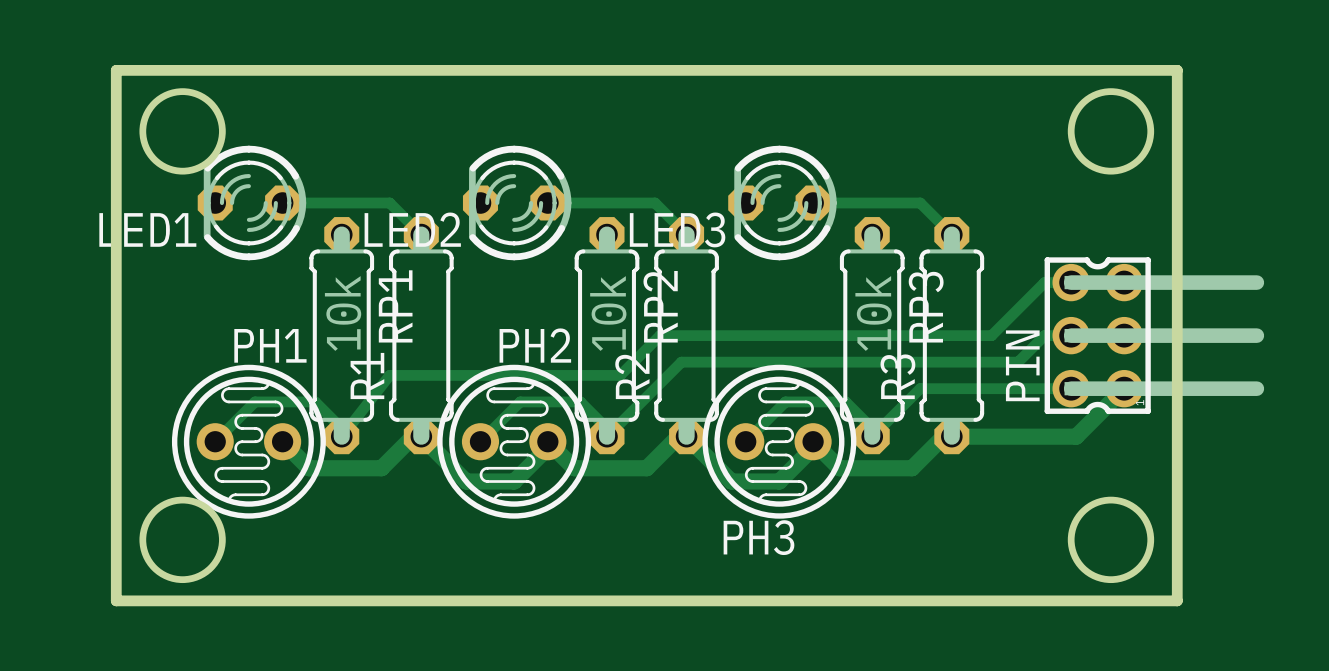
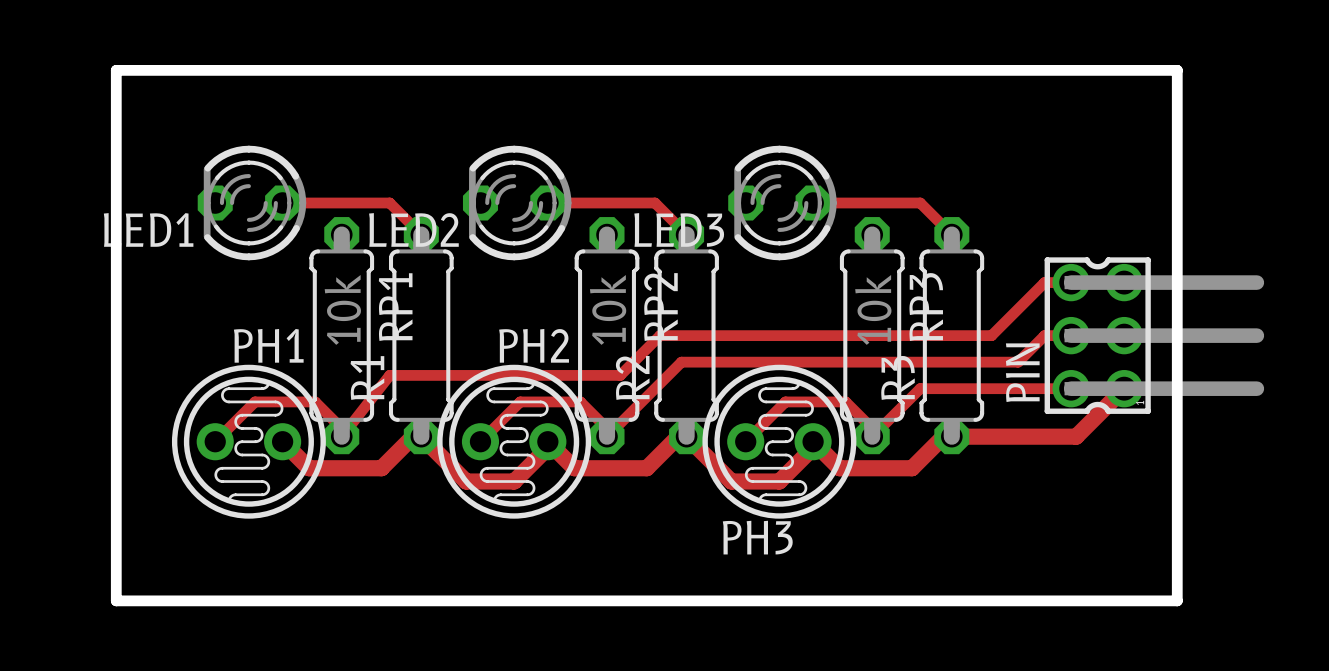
round board edge: [139, 88, 226, 175] -> none
round board edge: [1067, 88, 1155, 175] -> none
round board edge: [139, 496, 226, 584] -> none
round board edge: [1067, 496, 1155, 584] -> none

